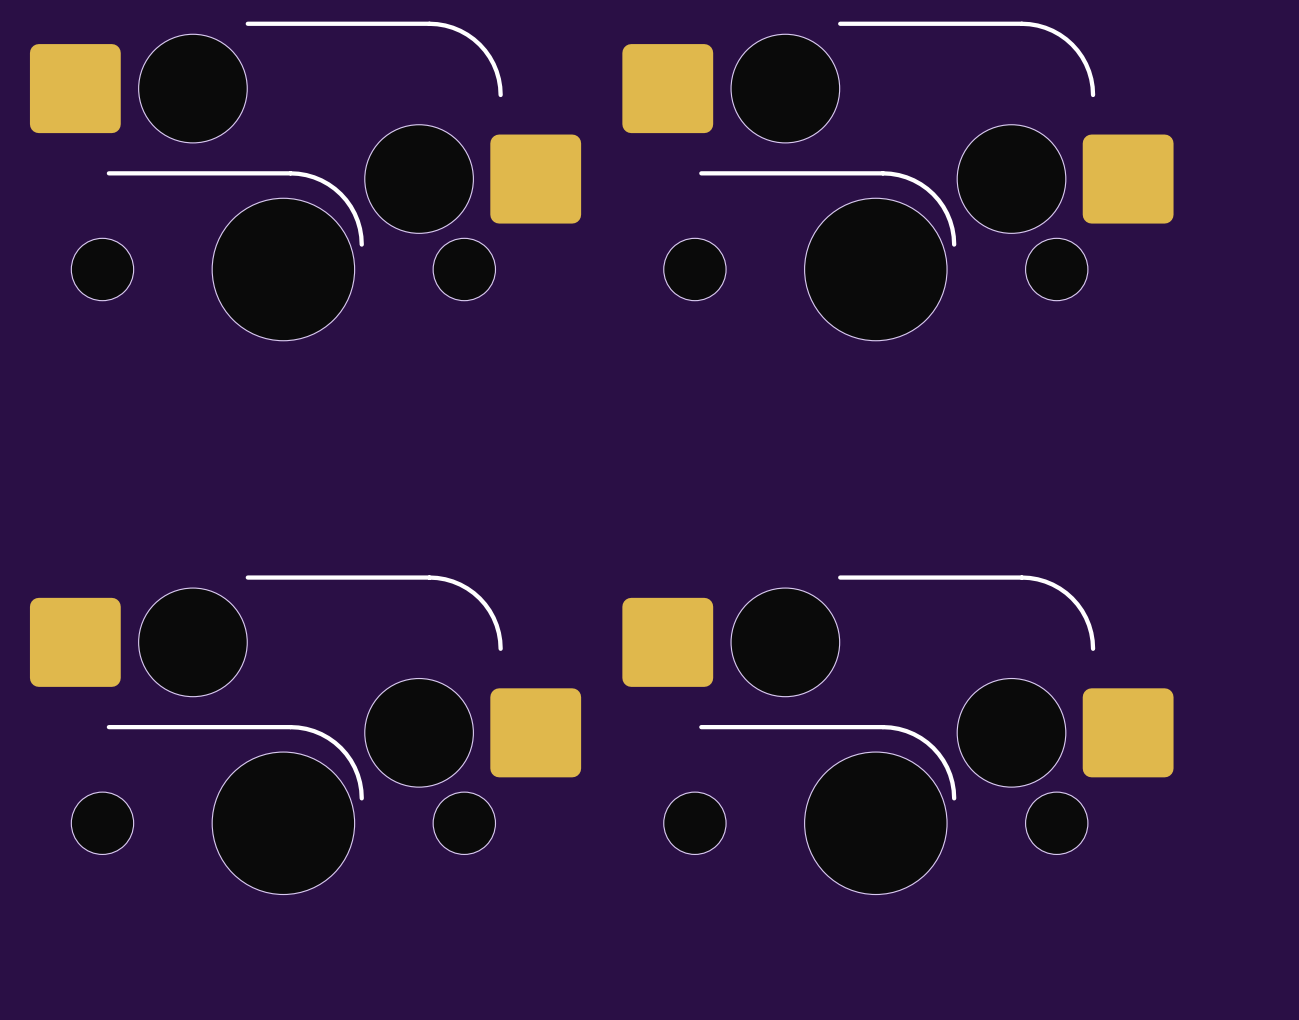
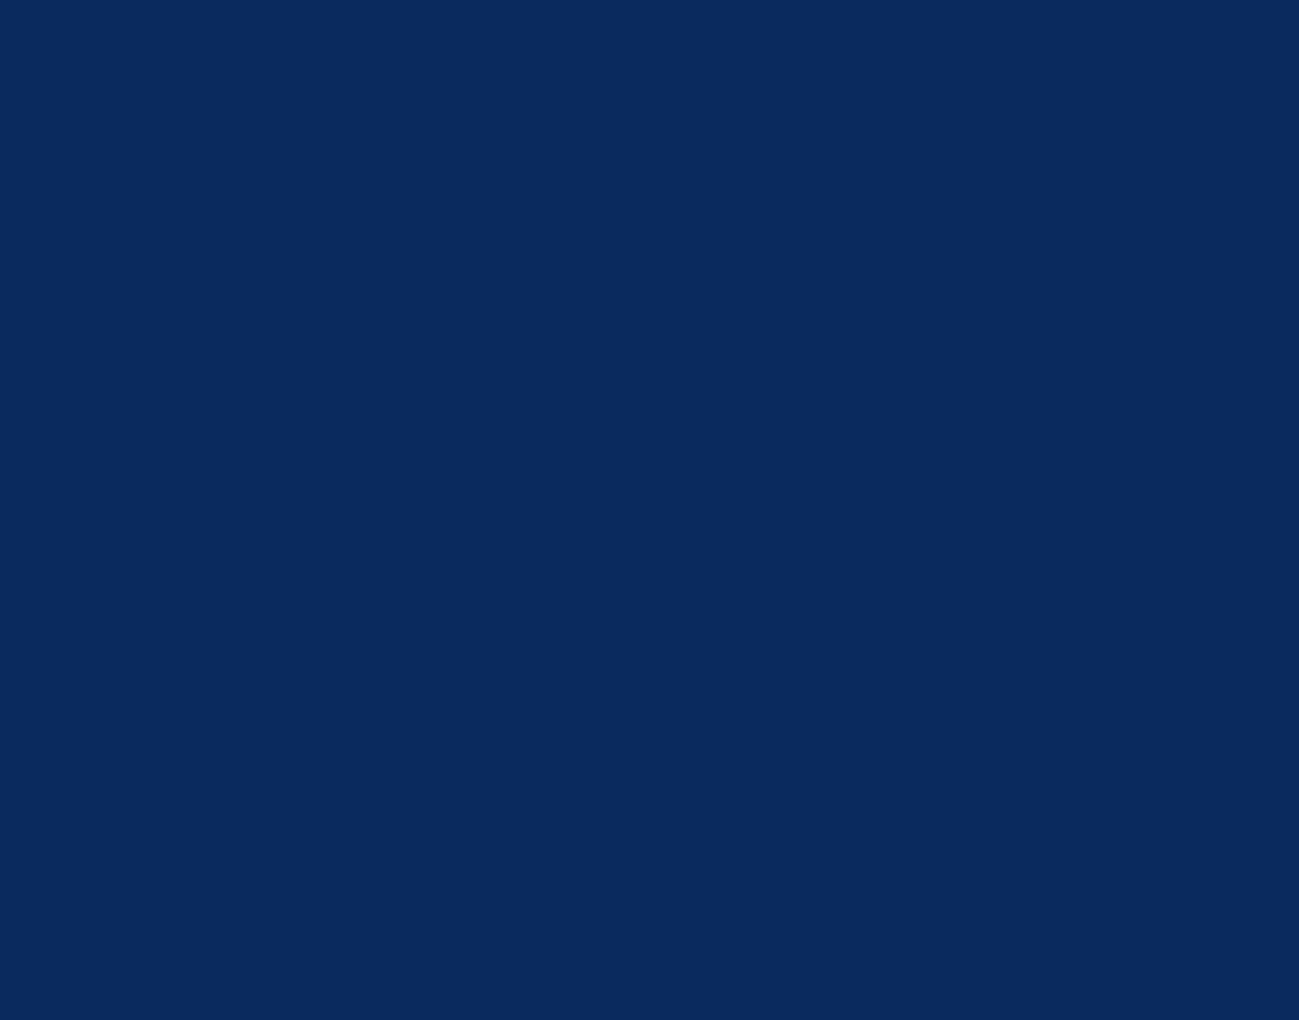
part: (305, 181) -> none
part: (897, 181) -> none
part: (305, 734) -> none
part: (897, 734) -> none

